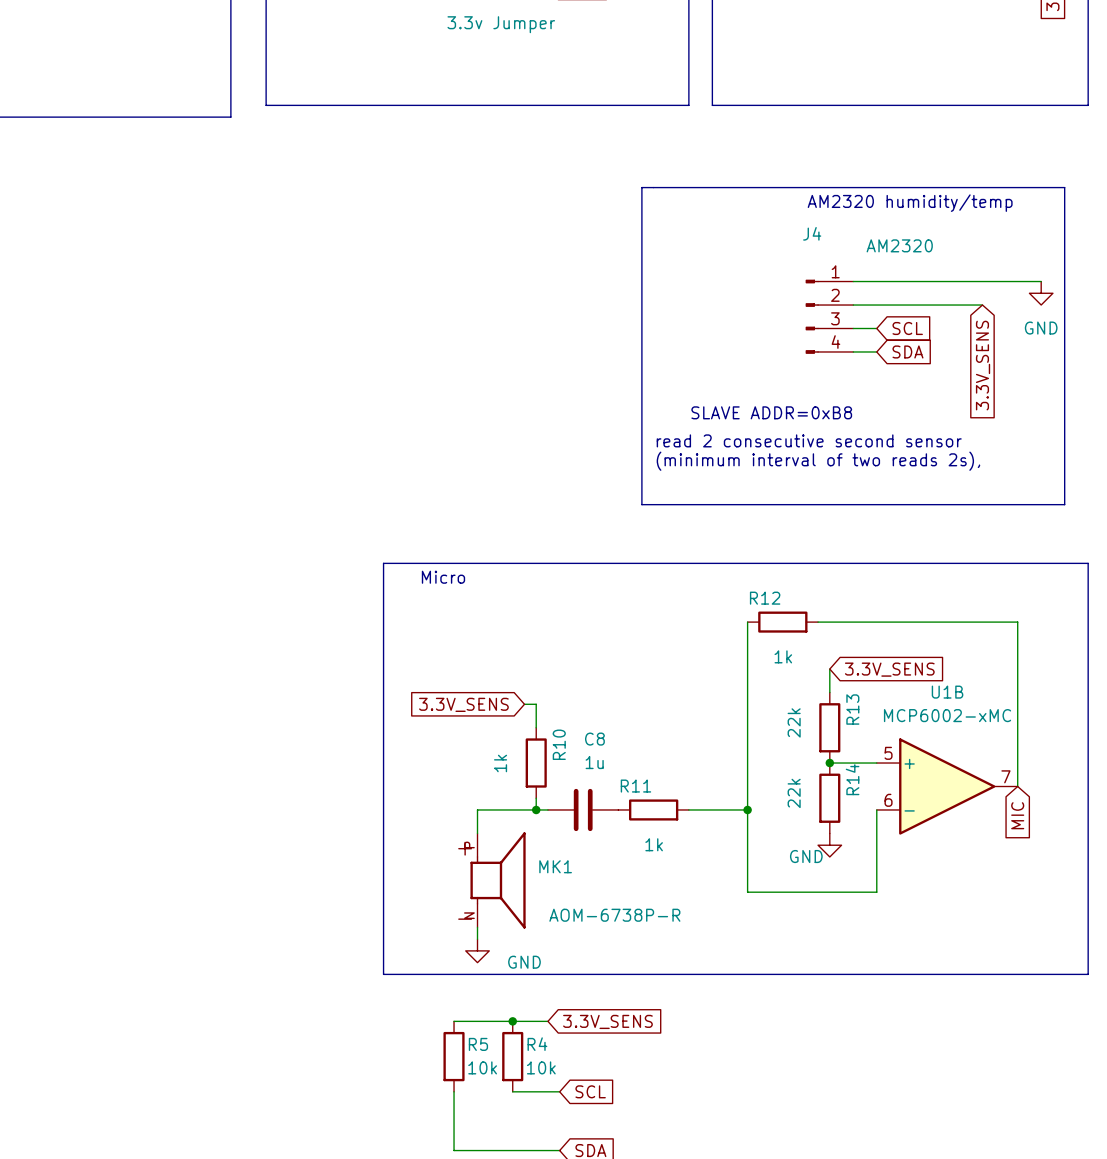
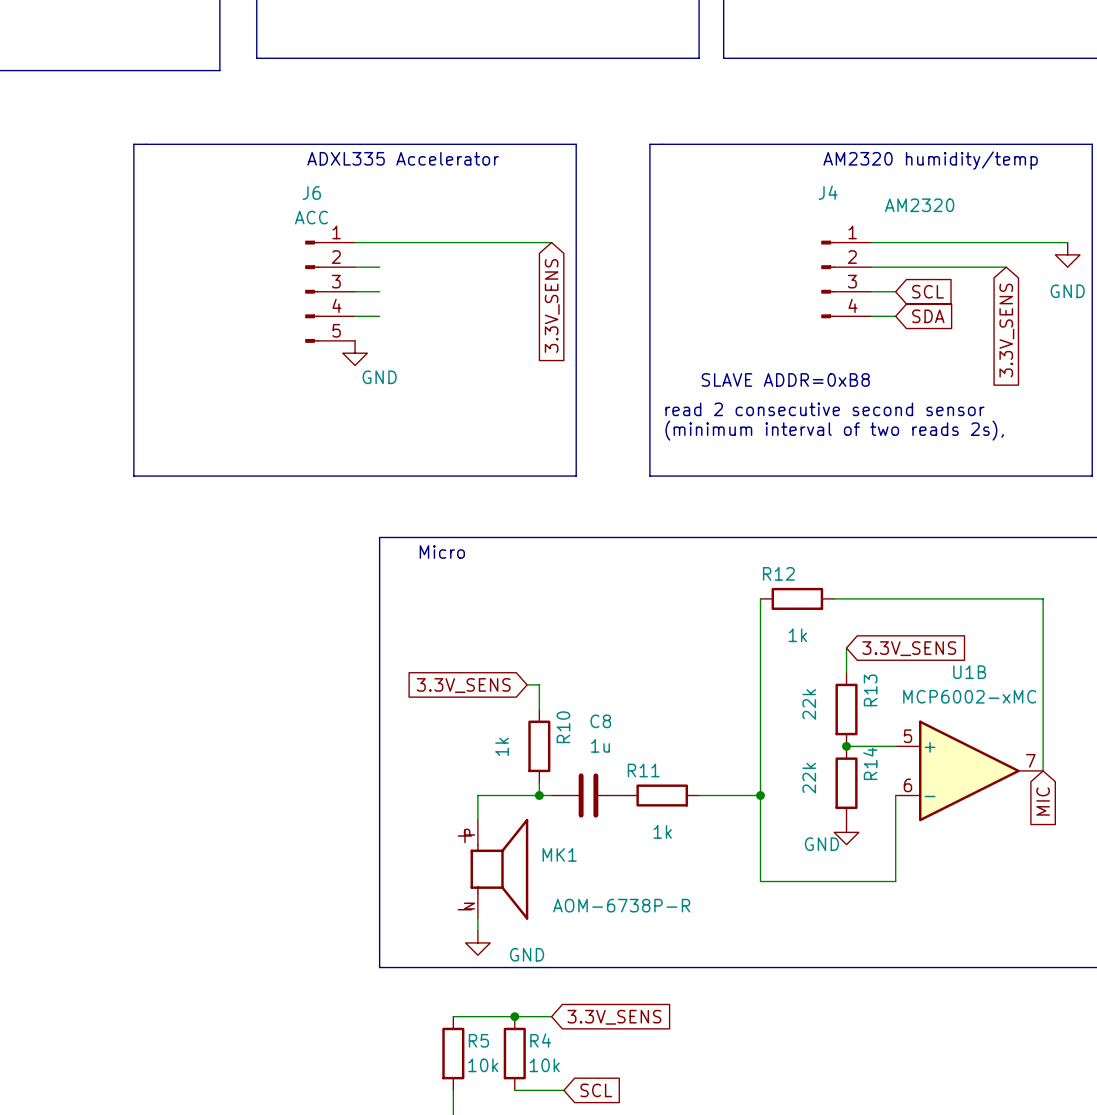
line: none -> (133, 144) (133, 476) (576, 476) (576, 144) (133, 144)
text: none -> ADXL335 Accelerator (403, 158)
wire: none -> (355, 242) (551, 242)
wire: none -> (355, 267) (379, 267)
J6: none -> ACC (330, 291)
wire: none -> (355, 291) (379, 291)
global label: none -> 3.3V_SENS (552, 305)
wire: none -> (355, 316) (379, 316)
power symbol: none -> GND (355, 353)

